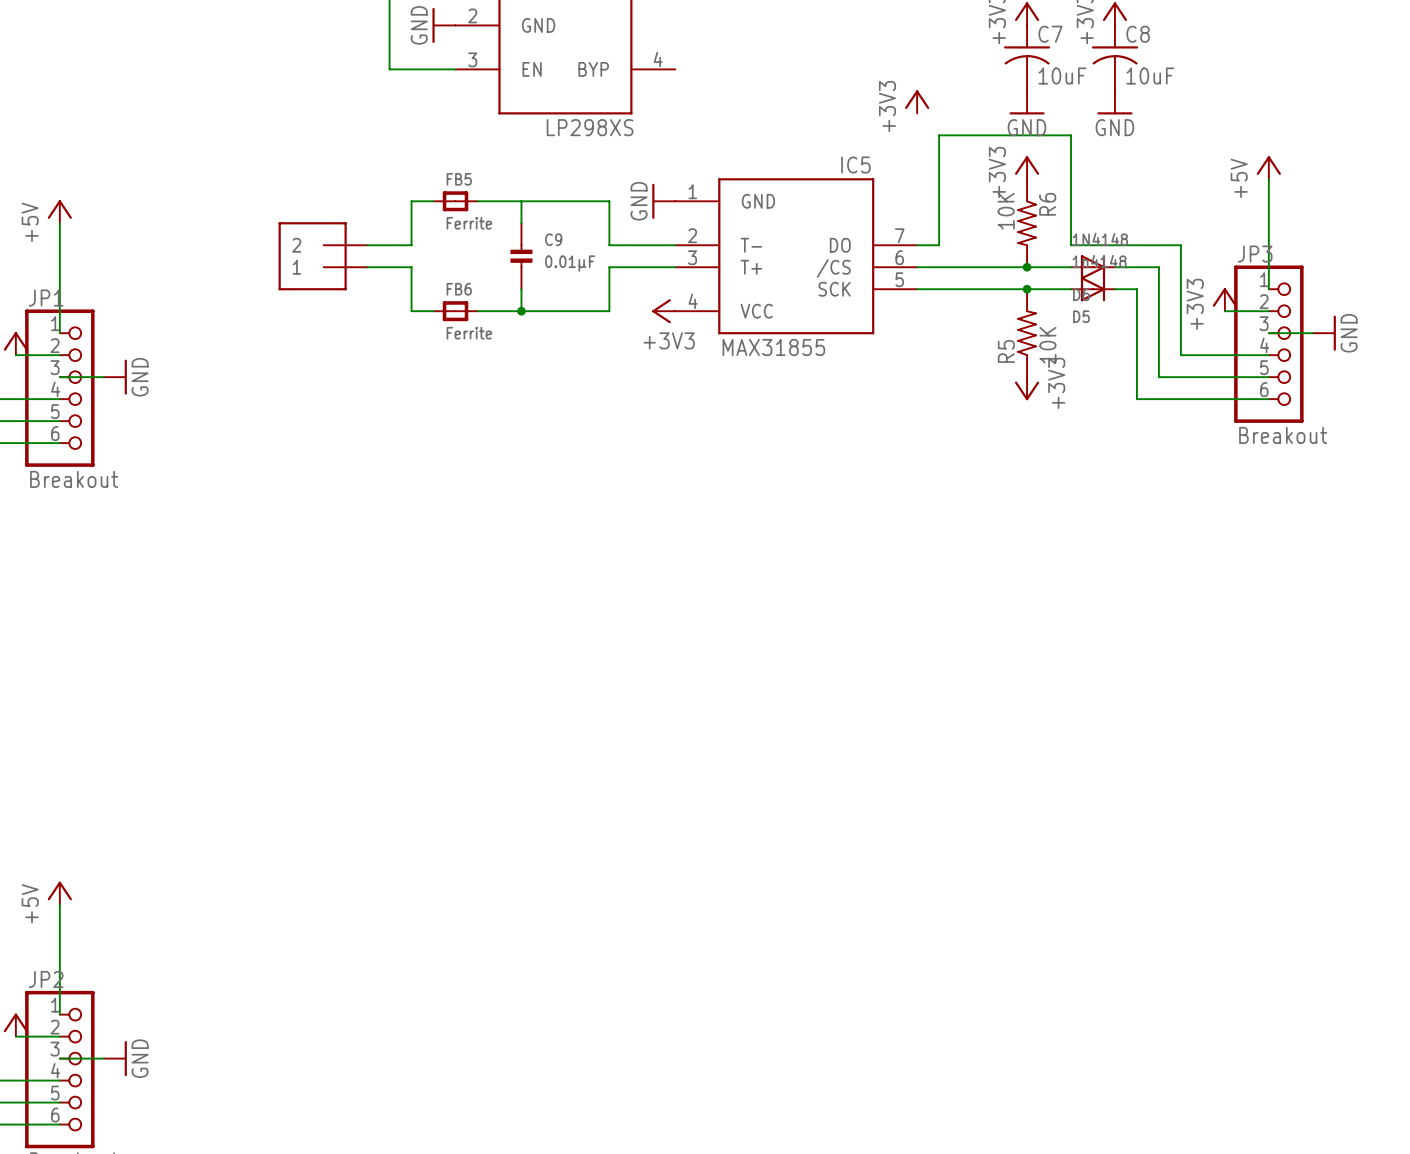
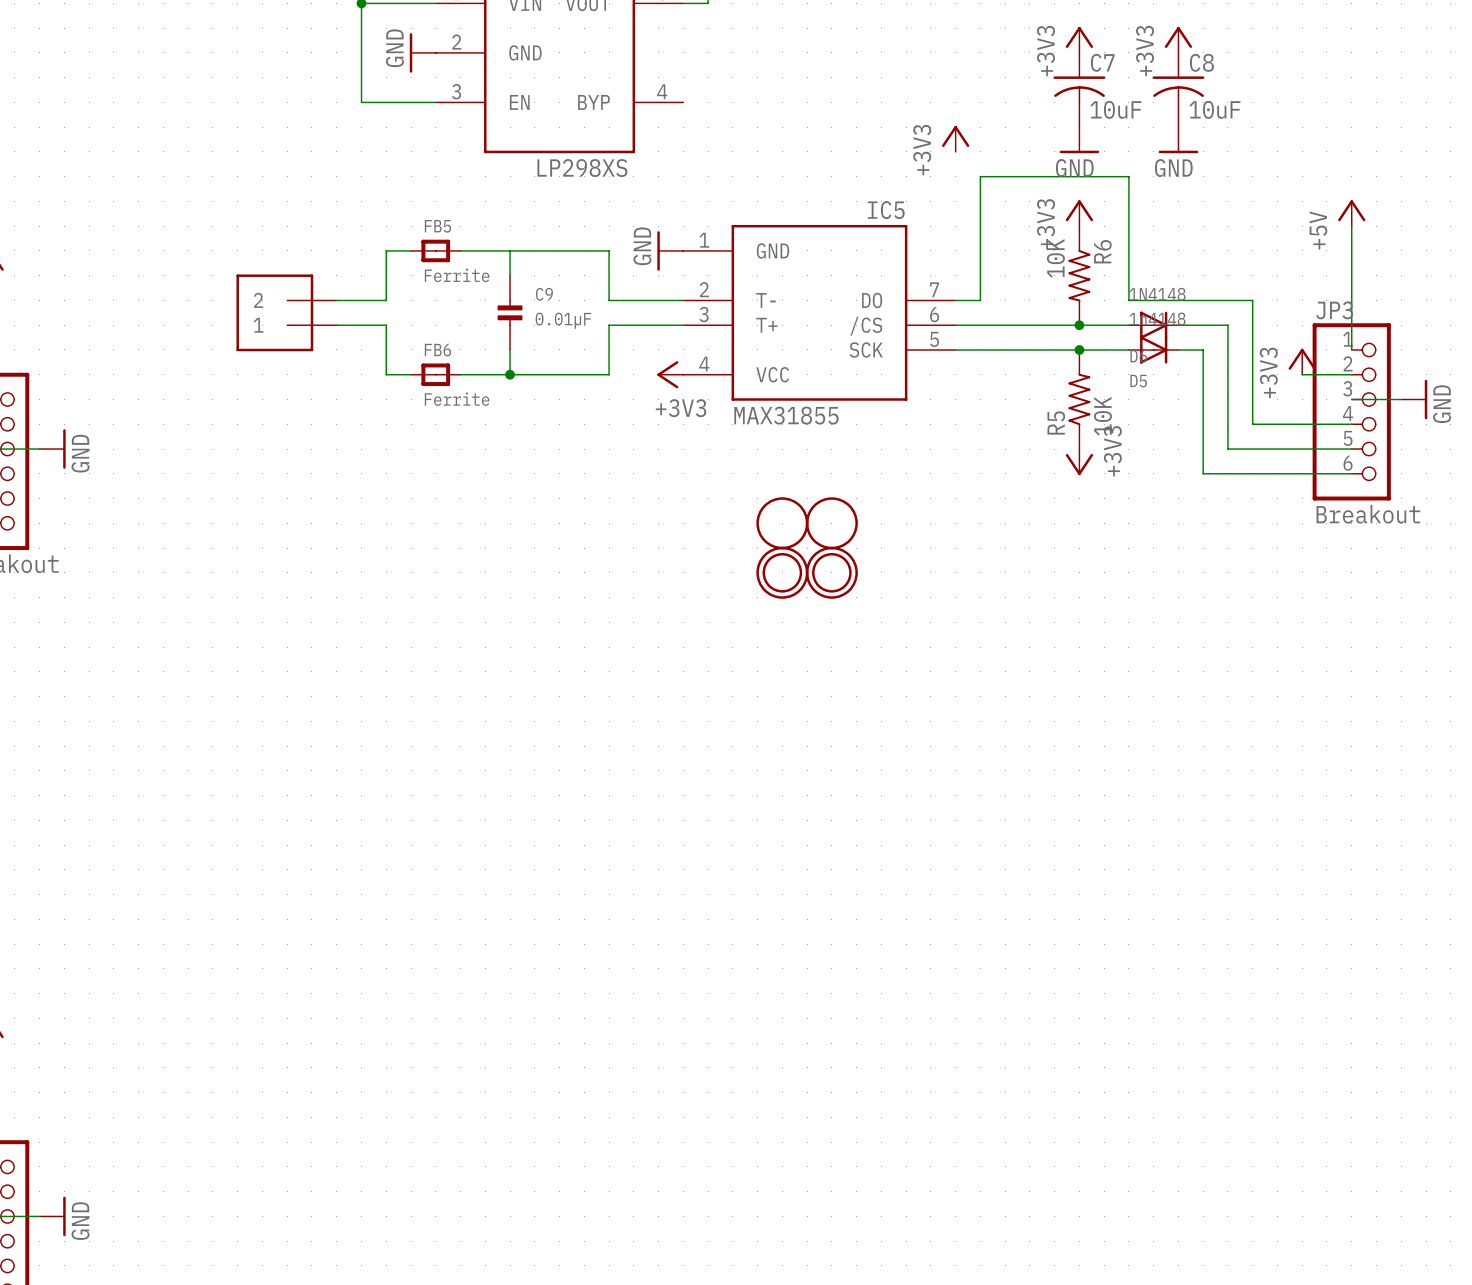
part: none -> (782, 523)
part: none -> (831, 523)
part: none -> (782, 572)
part: none -> (831, 572)

